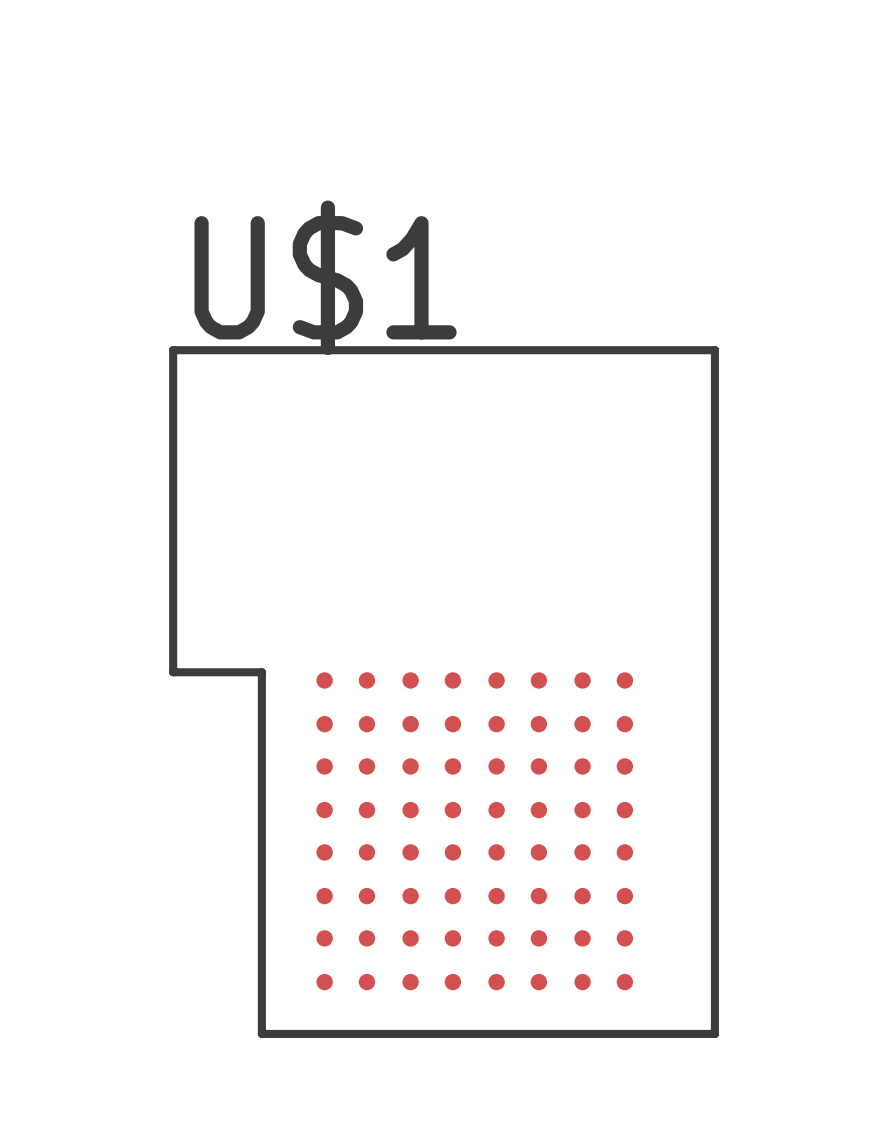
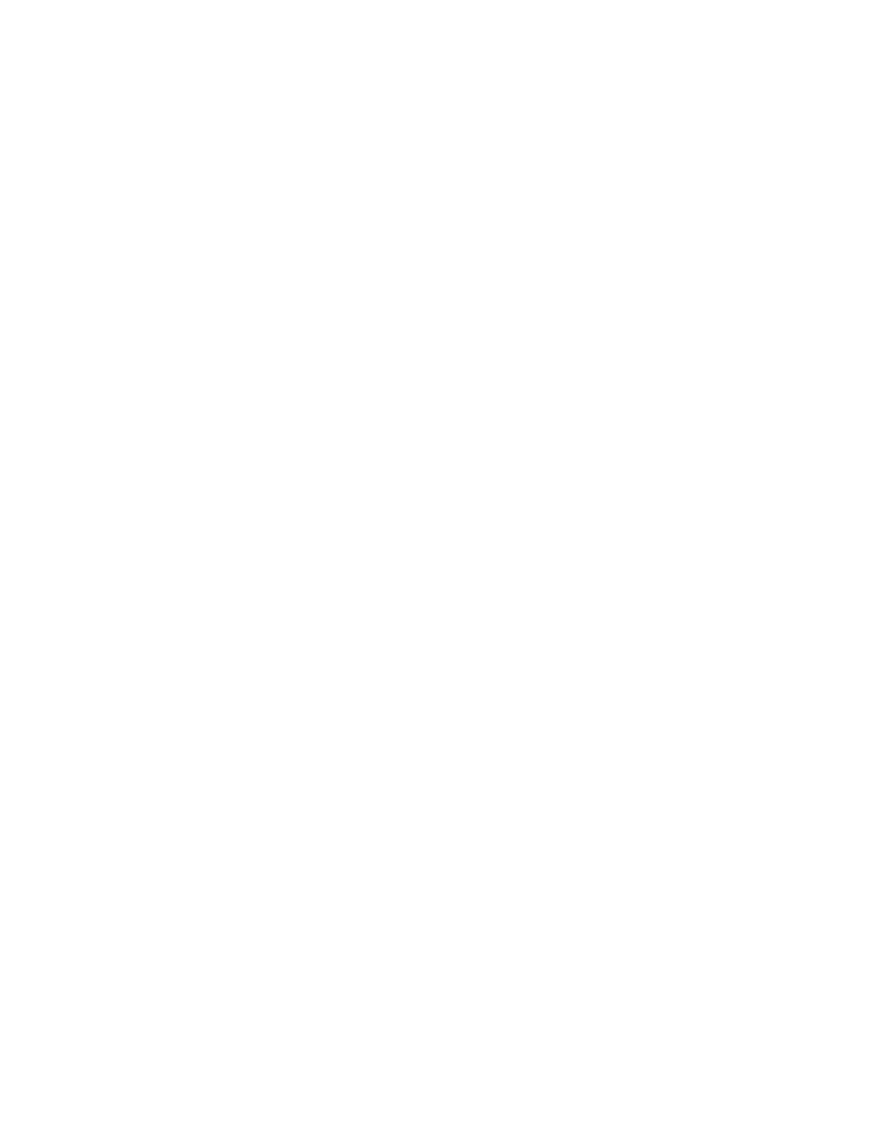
U$1: (444, 692) -> none

